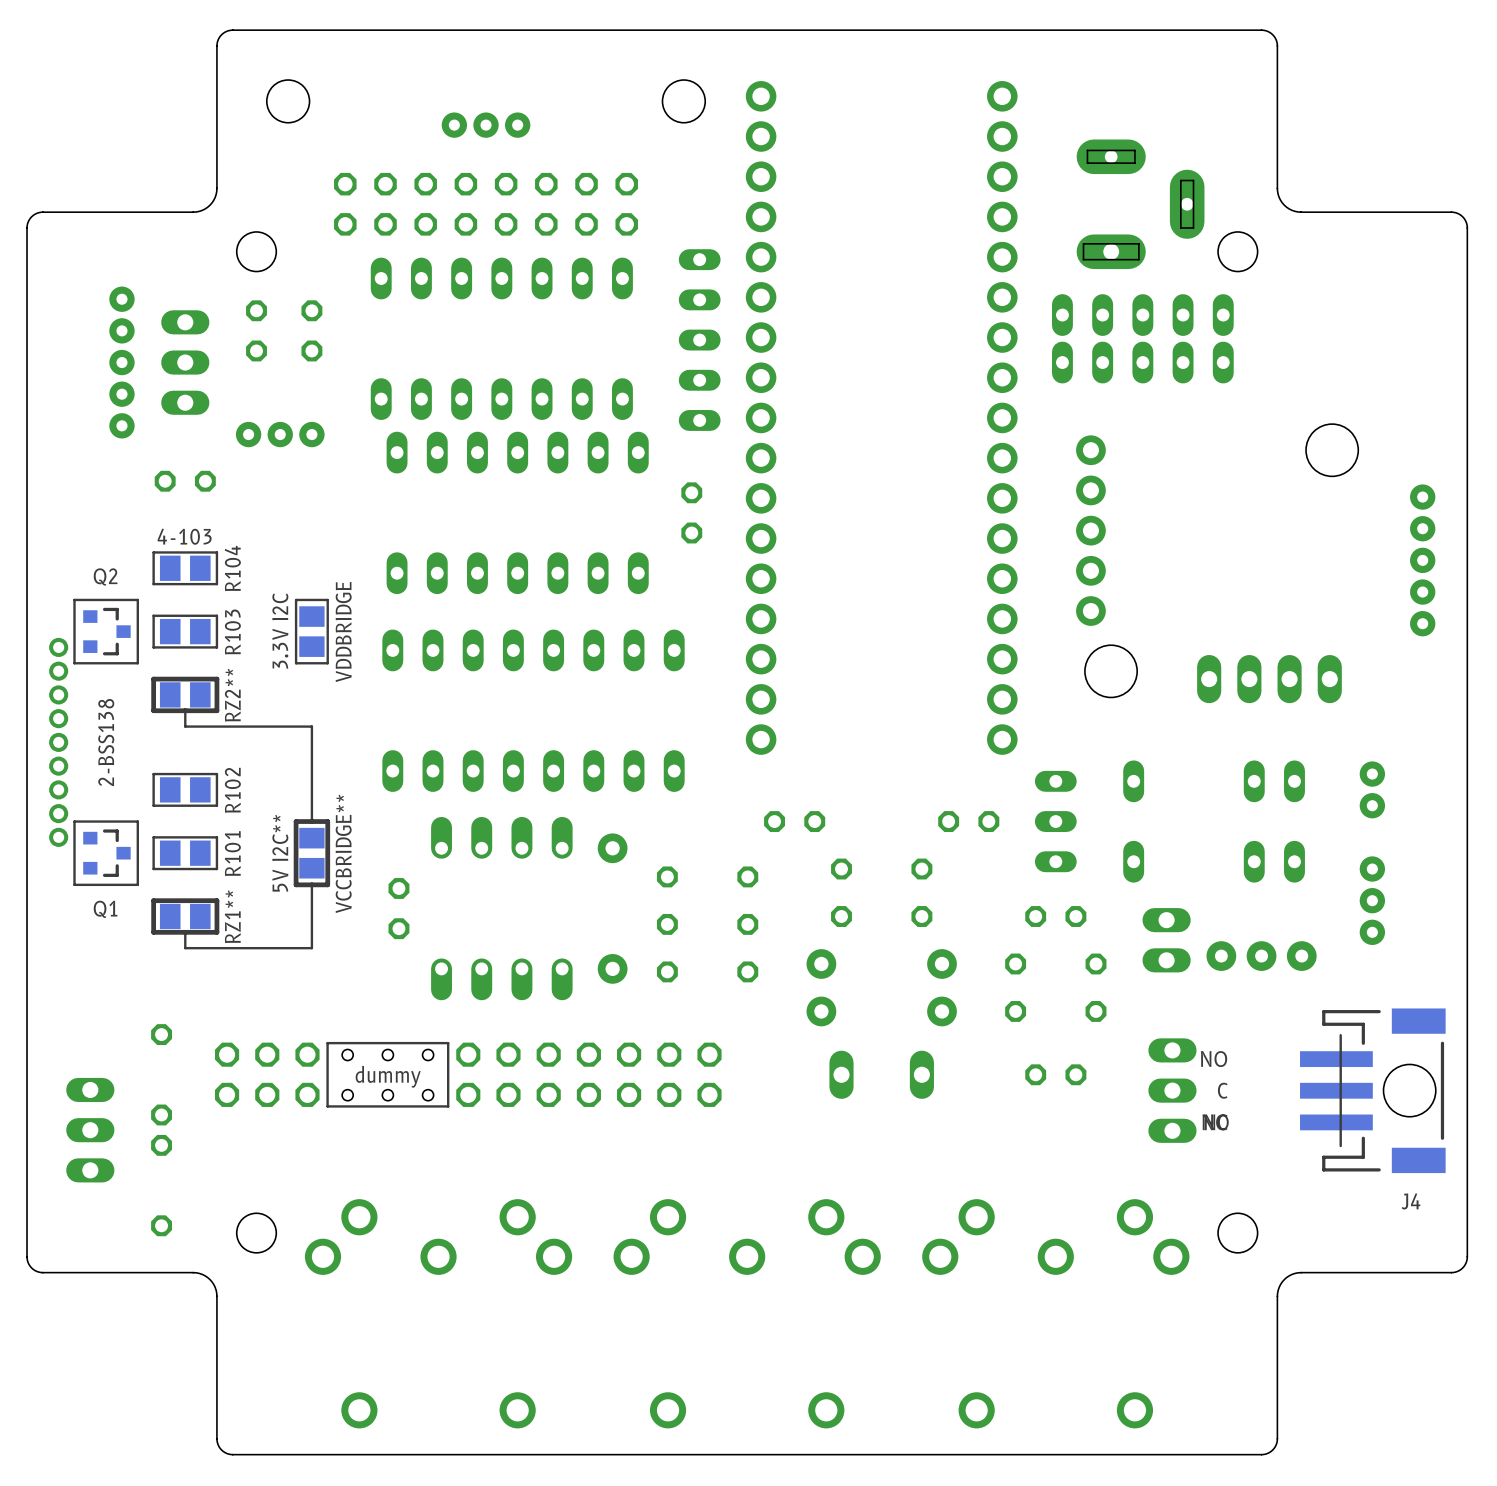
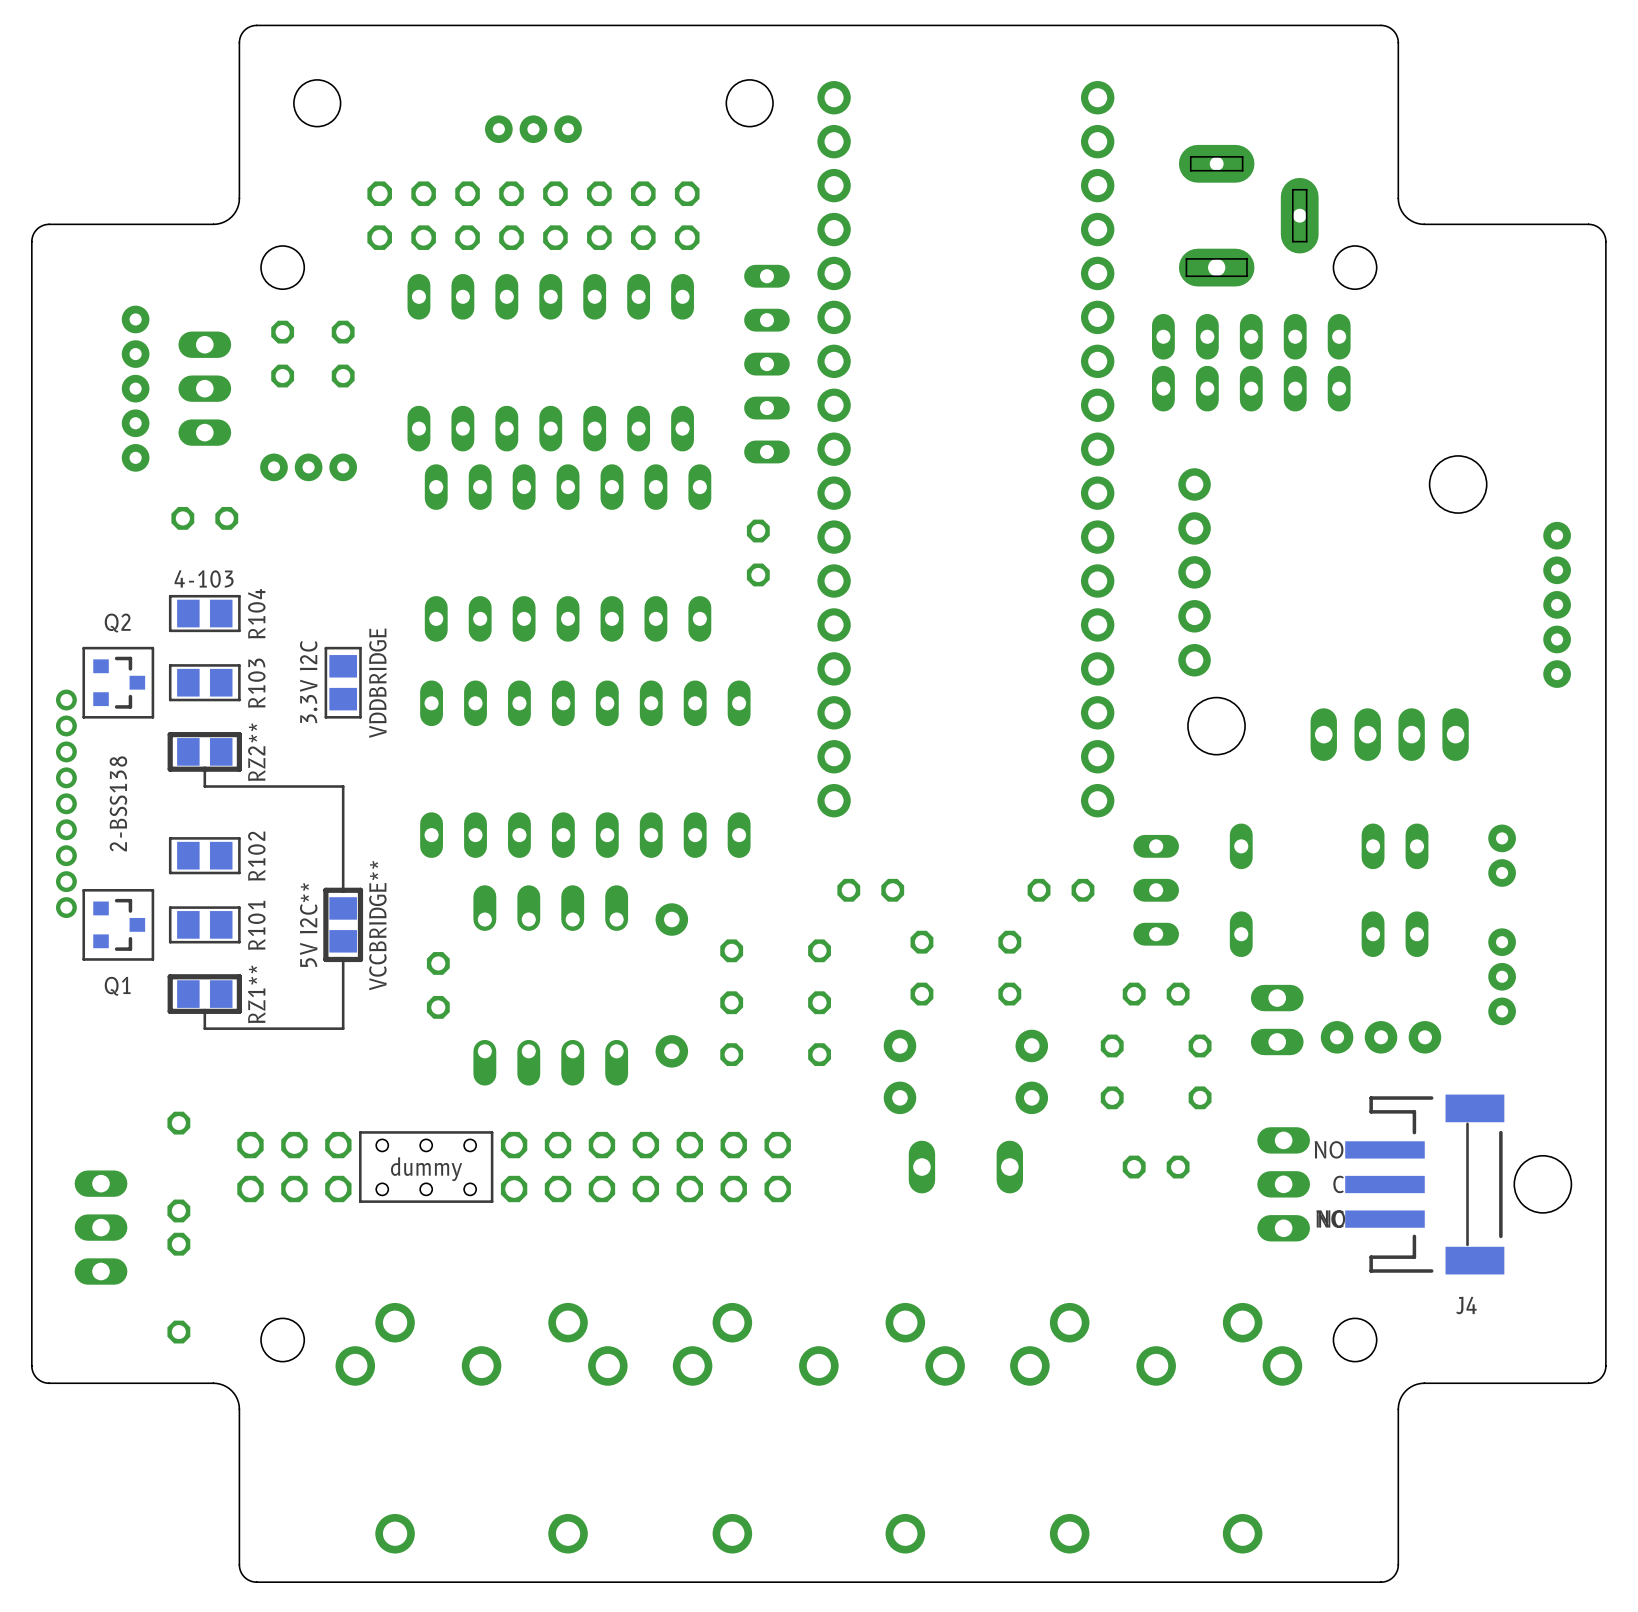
J4 position: (1372, 1090) -> (1424, 1184)

